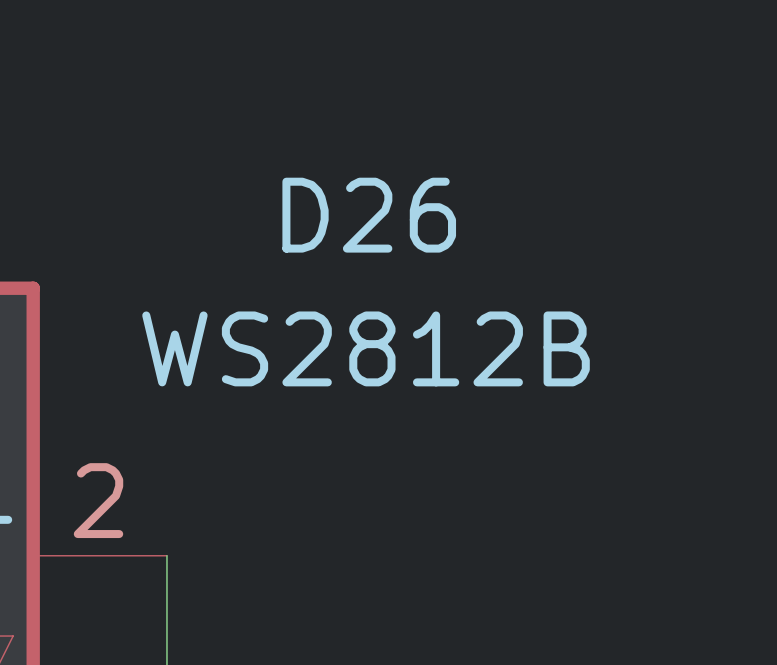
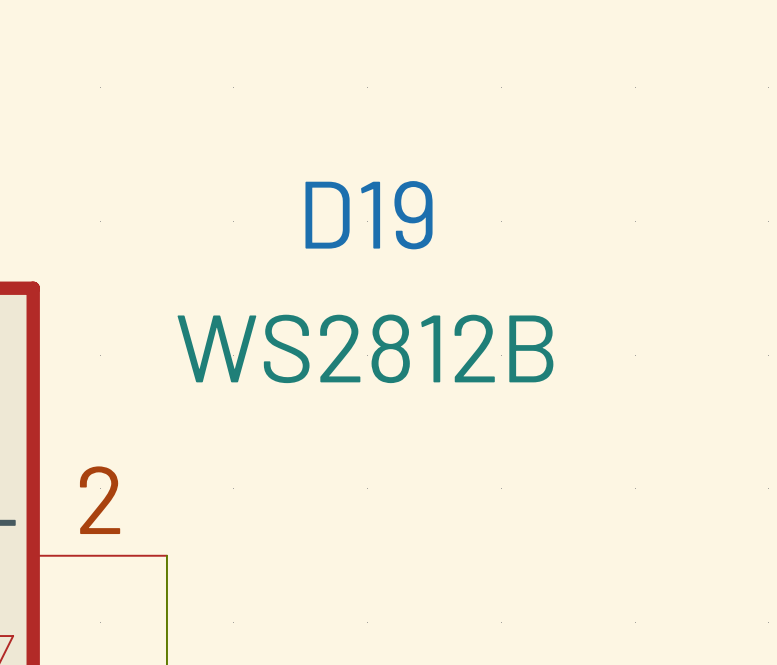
D26 name: D26 (369, 215) -> D19 (369, 215)

